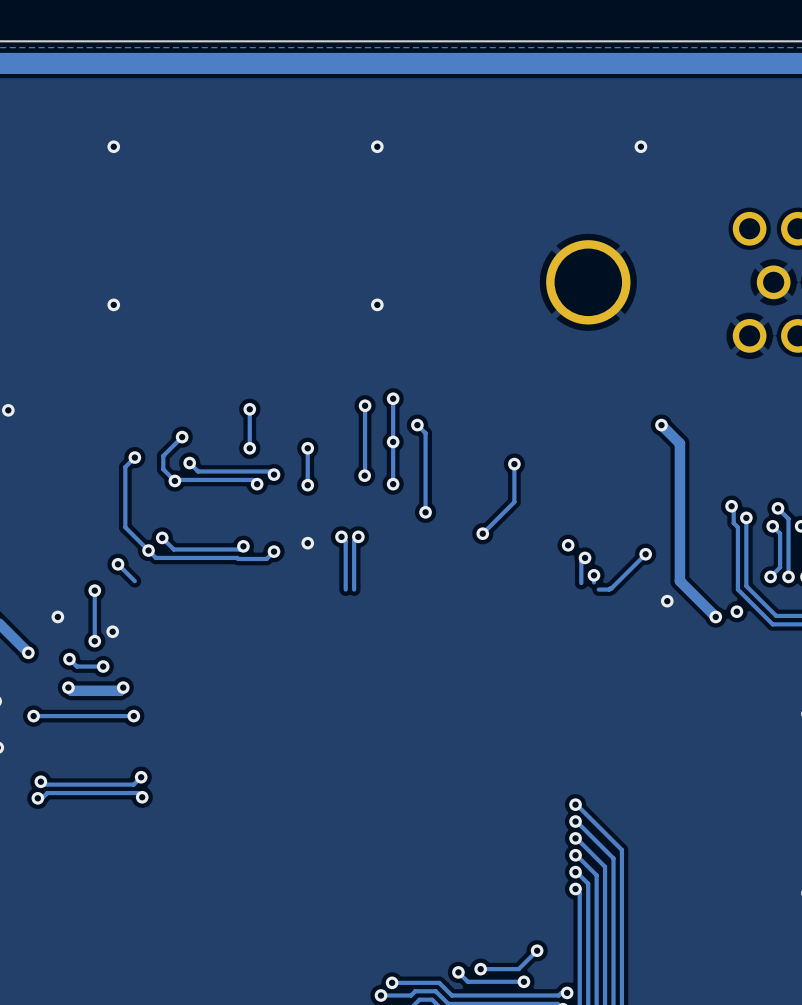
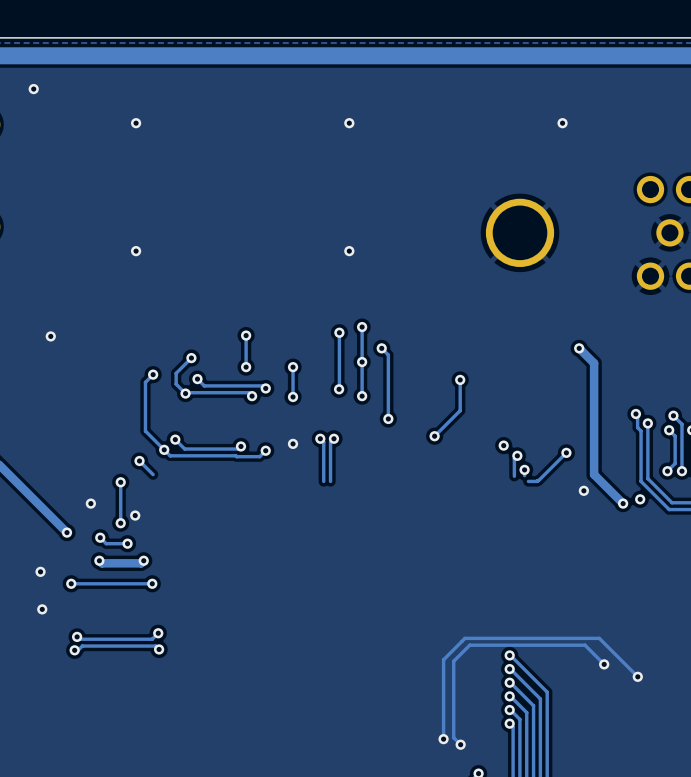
track: none -> (604, 664) (585, 645) (469, 645) (453, 661) (453, 737) (460, 744)
via: none -> (604, 664)
track: none -> (637, 676) (599, 638) (465, 638) (443, 659) (443, 739)
via: none -> (637, 676)
via: none -> (443, 739)
via: none -> (460, 744)

